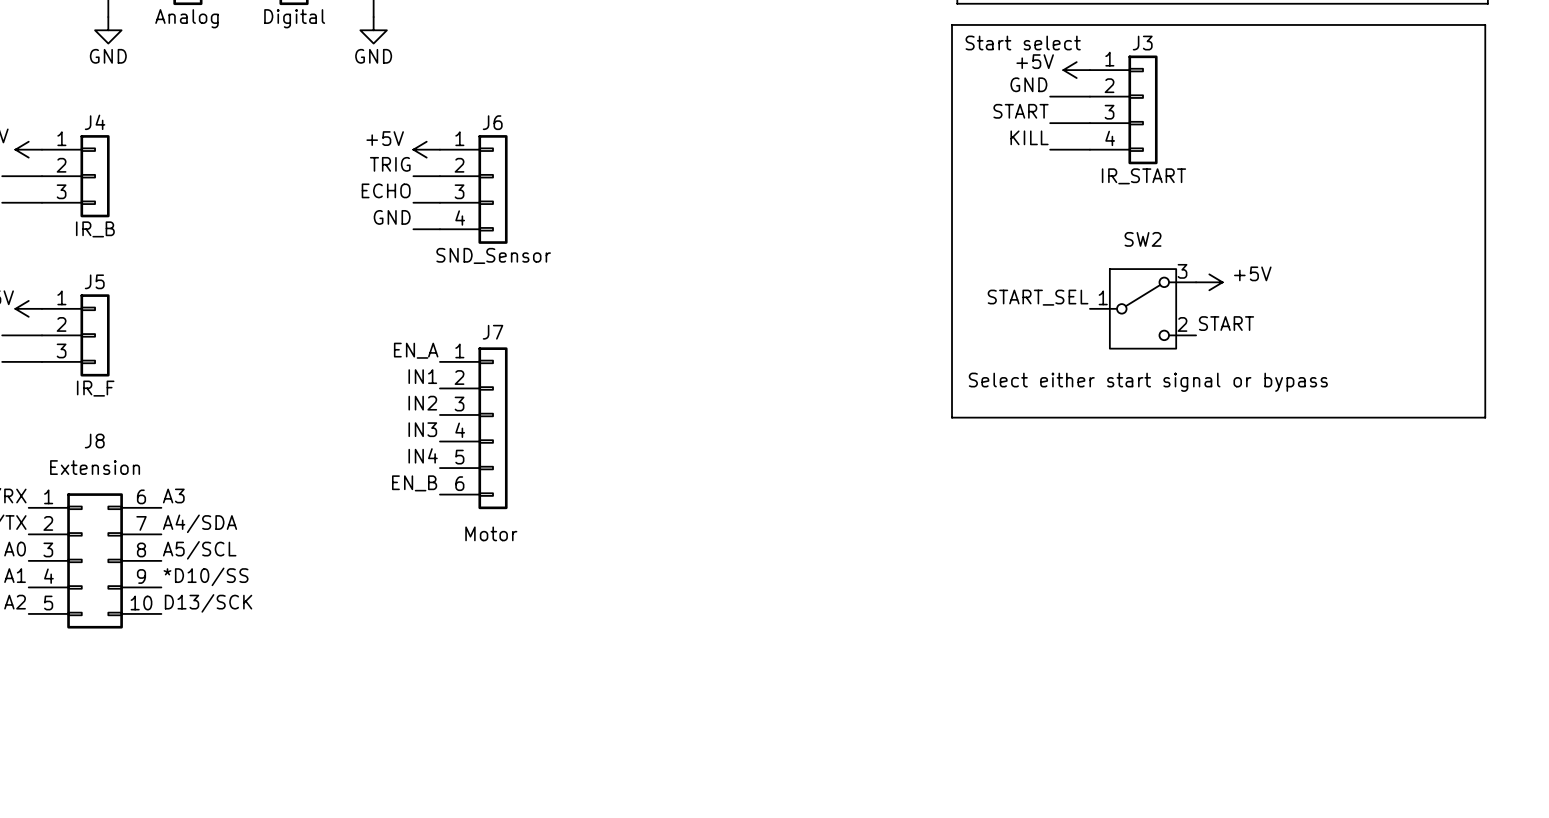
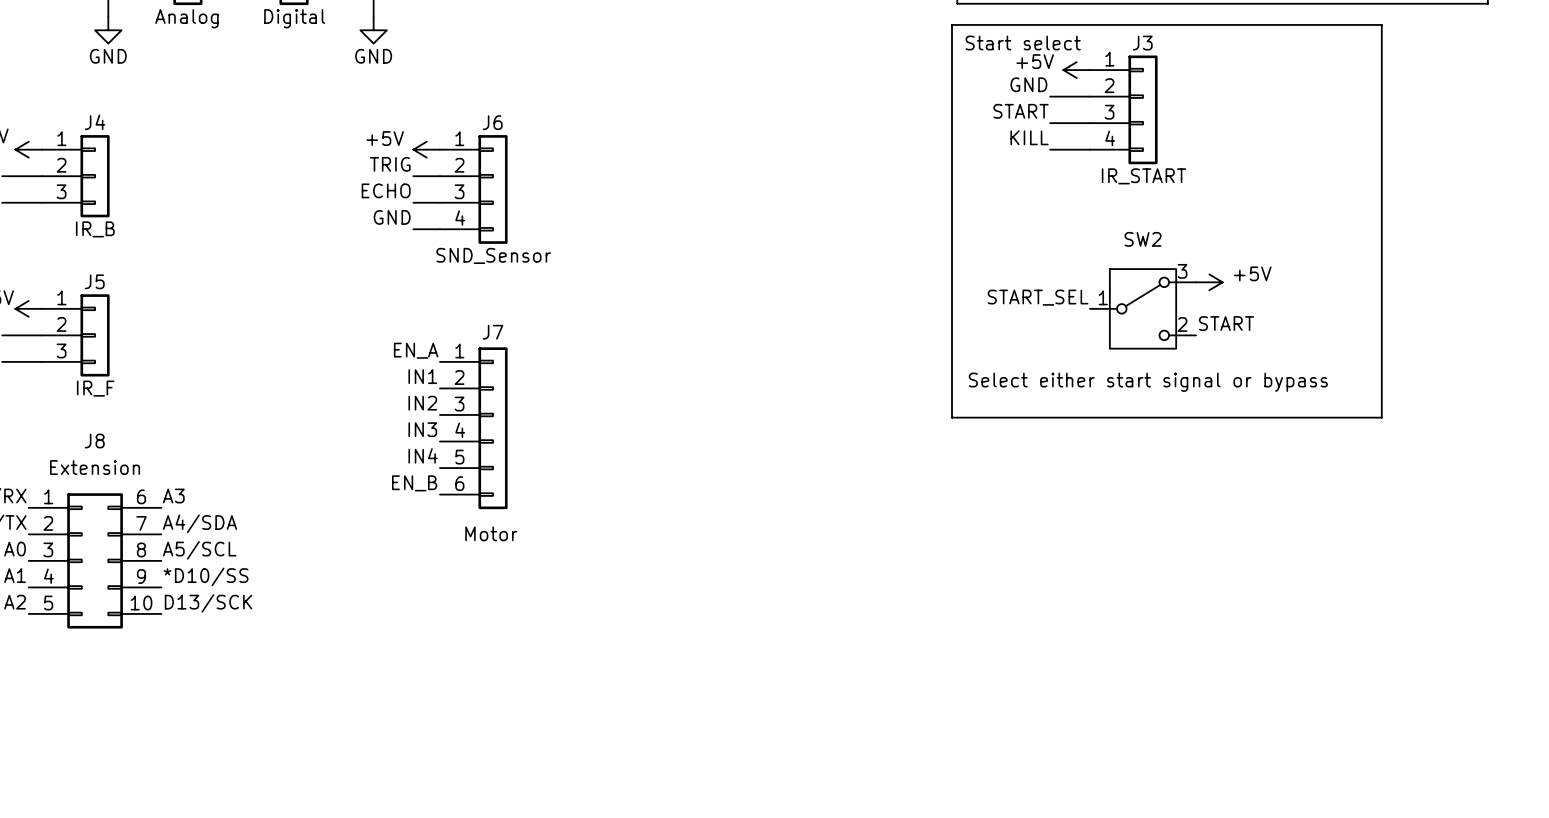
line: (1381, 24) (1485, 24) (1485, 417) (1381, 417) -> (1381, 24) (1381, 417)

